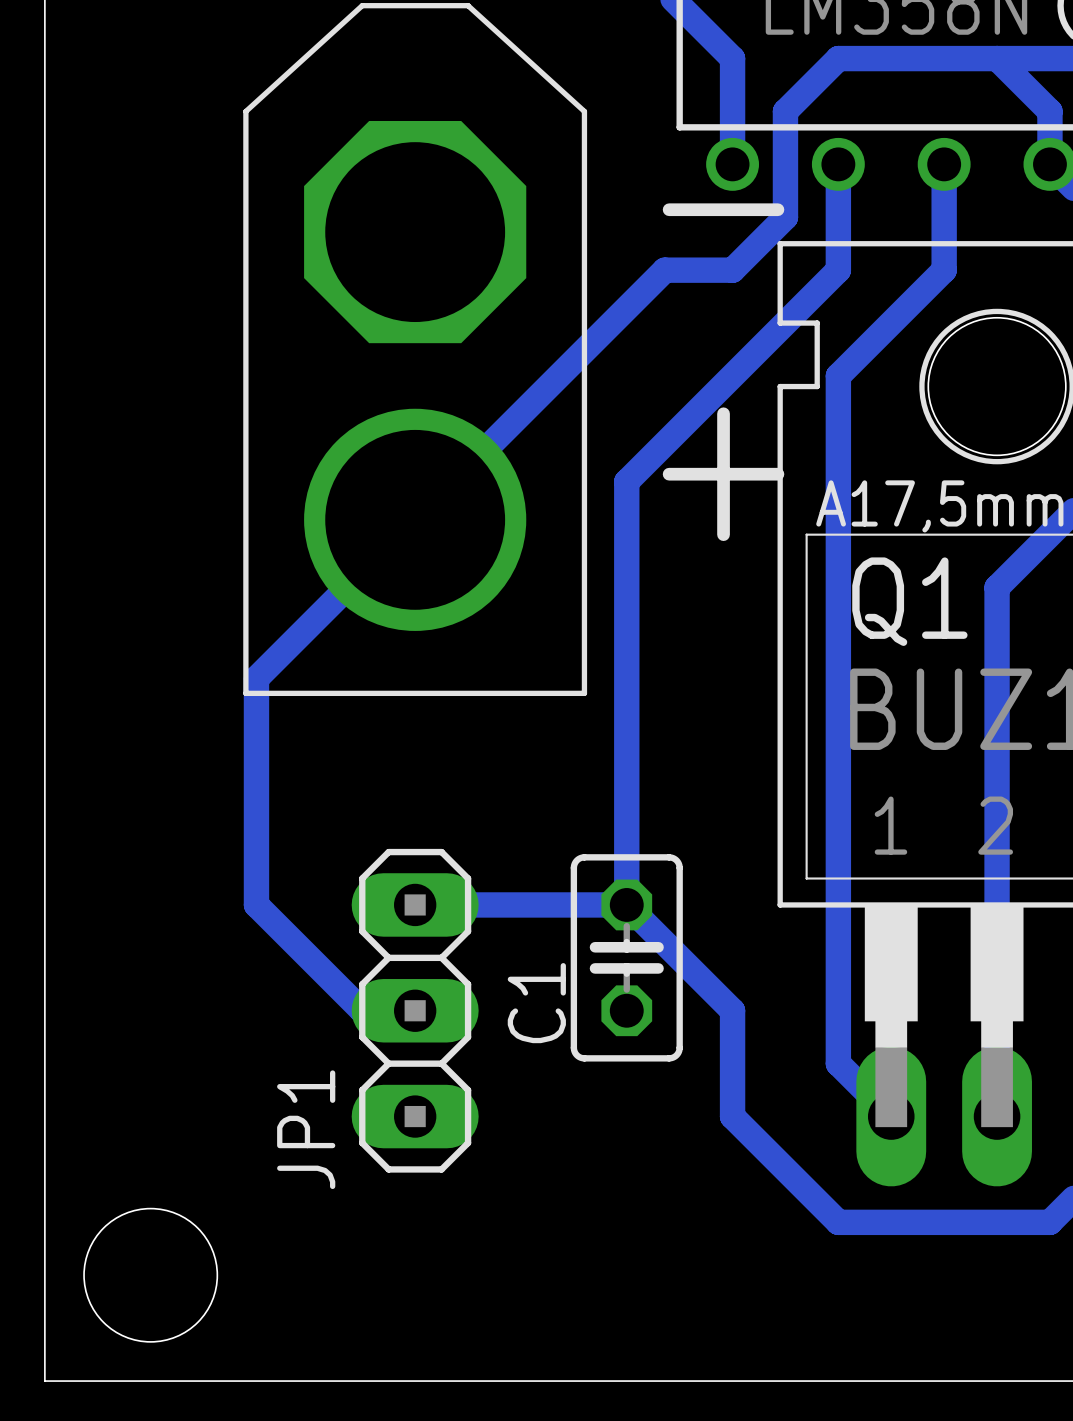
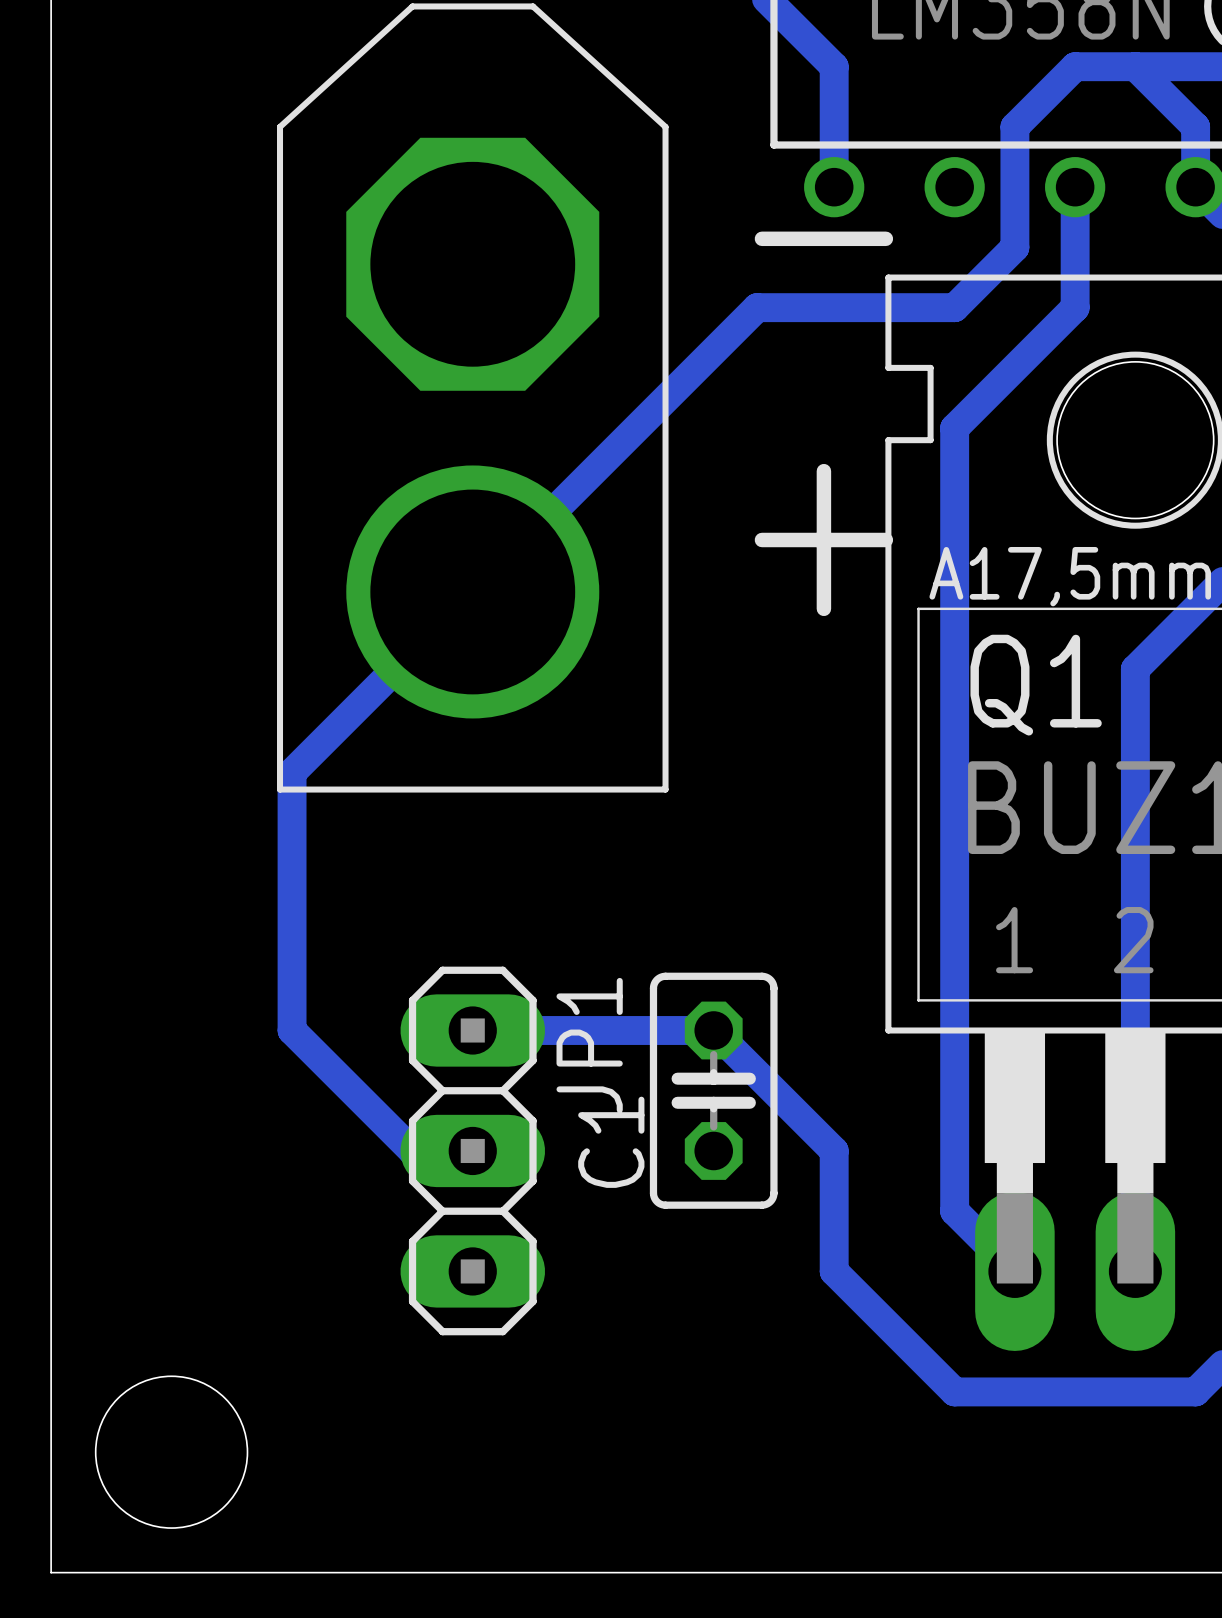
bottom track: (944, 58) (838, 58) (785, 111) (785, 217) (732, 270) -> (1075, 66) (1014, 126) (1014, 247) (954, 307) (834, 307)
bottom track: (838, 164) (838, 270) (626, 481) (626, 904) -> none
JP1 name position: JP1 (306, 1129) -> JP1 (589, 1045)

